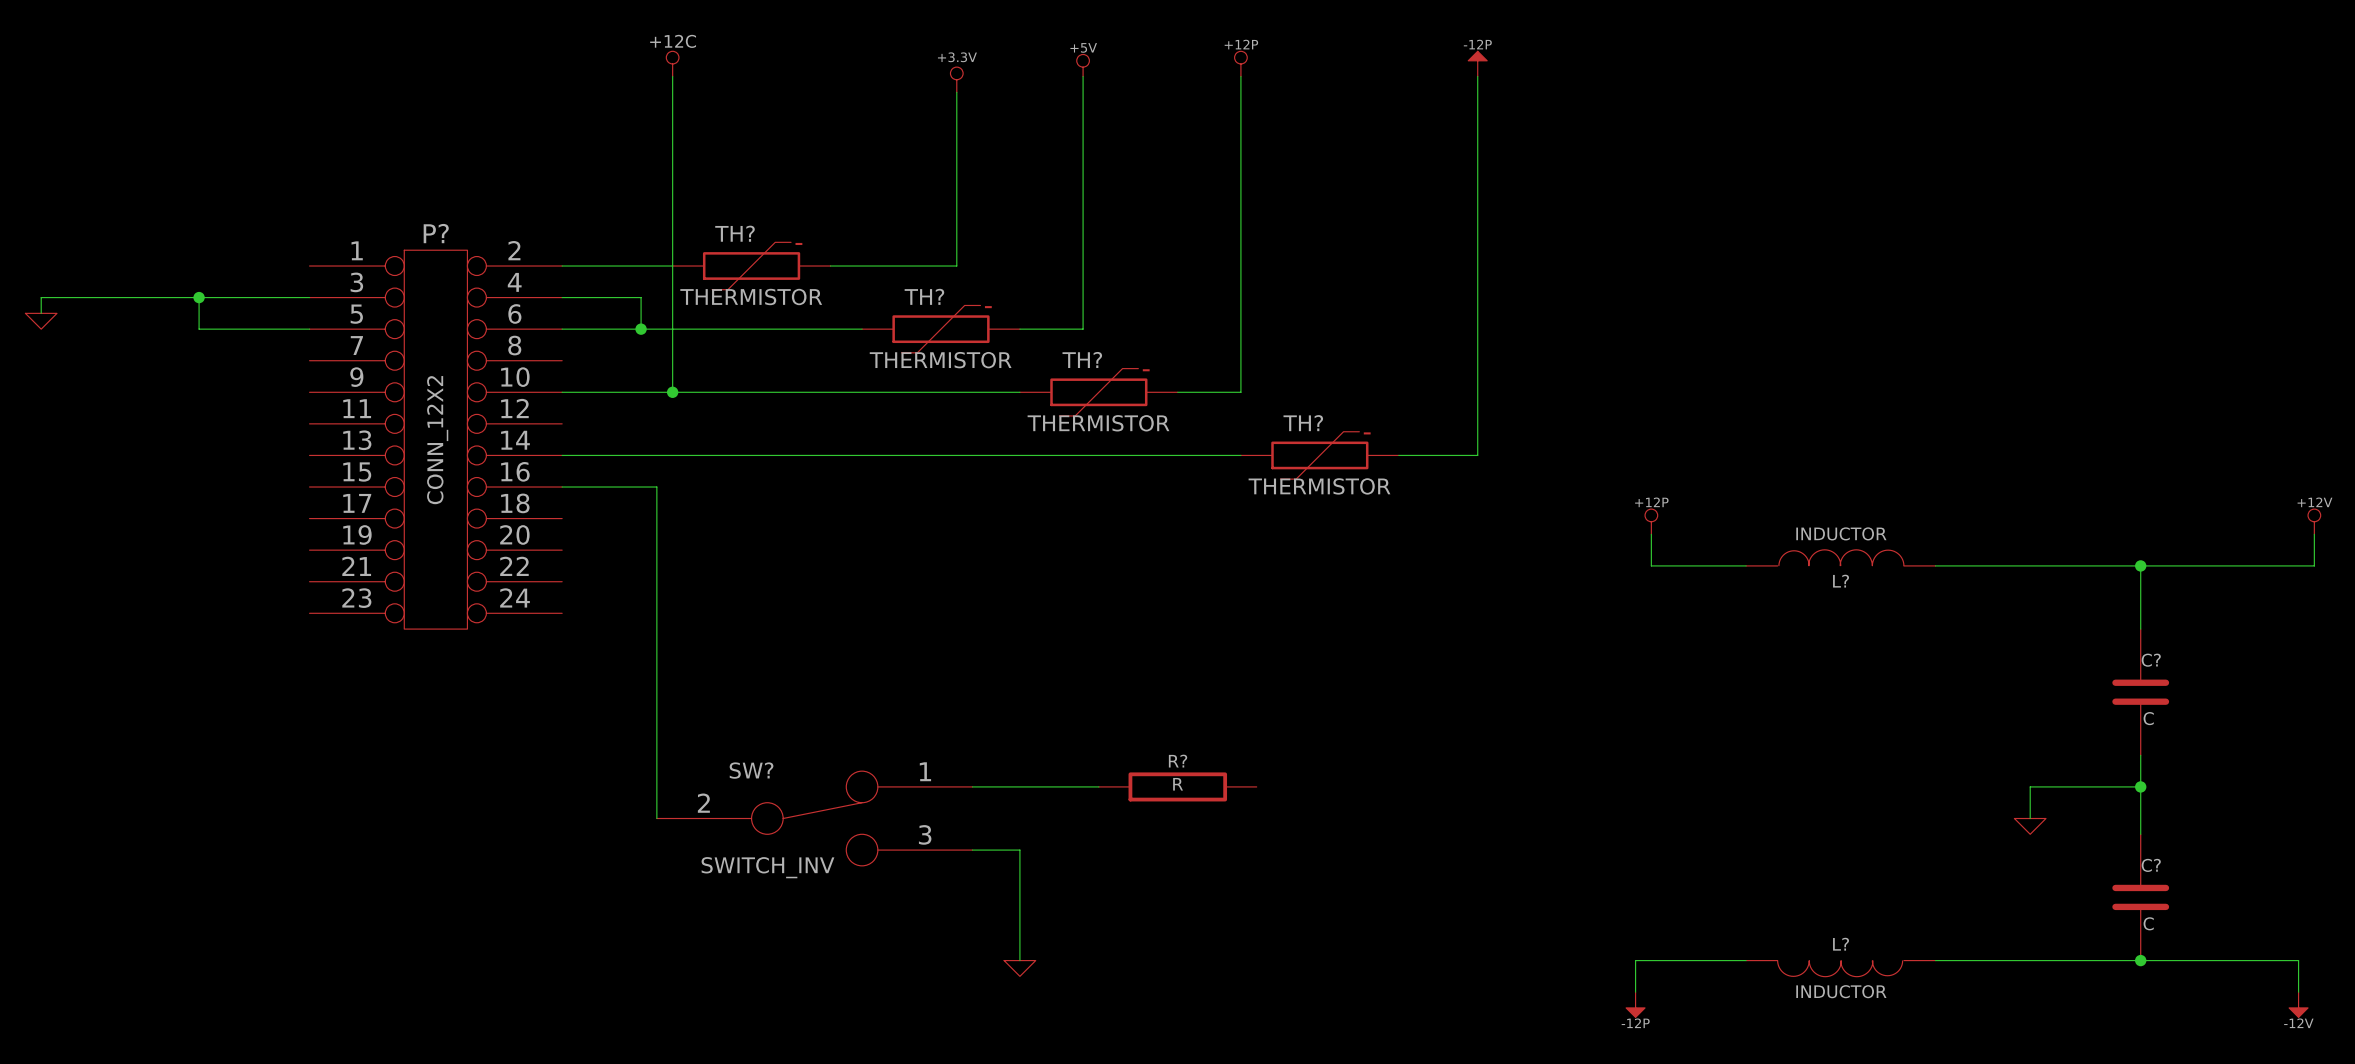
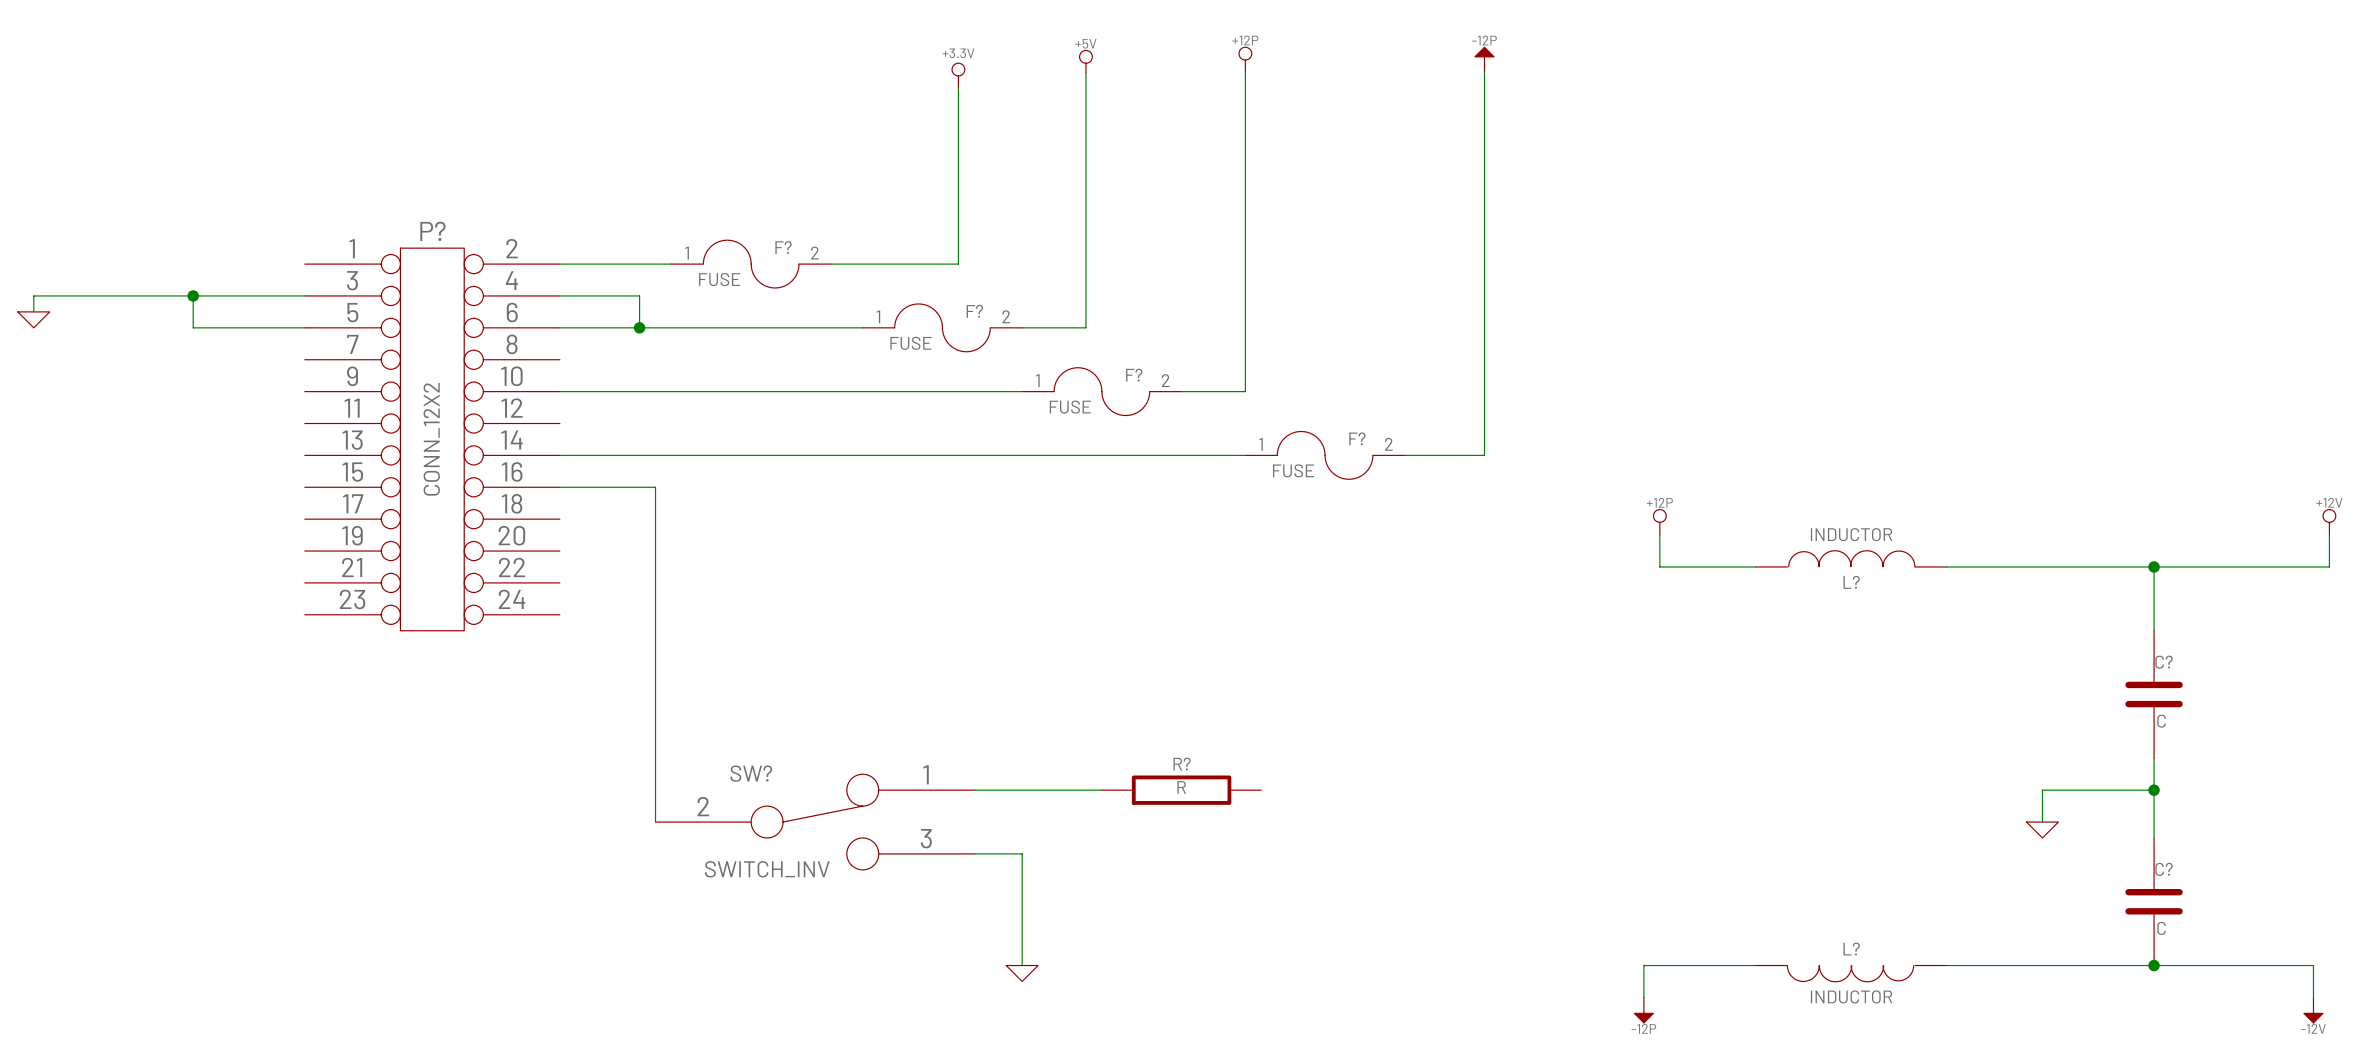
power symbol: +12C (672, 63) -> none
wire: (672, 76) (672, 392) -> none
TH?: THERMISTOR (751, 266) -> none
F?: none -> FUSE (751, 264)
TH?: THERMISTOR (941, 329) -> none
F?: none -> FUSE (942, 327)
junction: (672, 392) -> none
TH?: THERMISTOR (1098, 392) -> none
F?: none -> FUSE (1101, 391)
TH?: THERMISTOR (1319, 455) -> none
F?: none -> FUSE (1325, 455)

